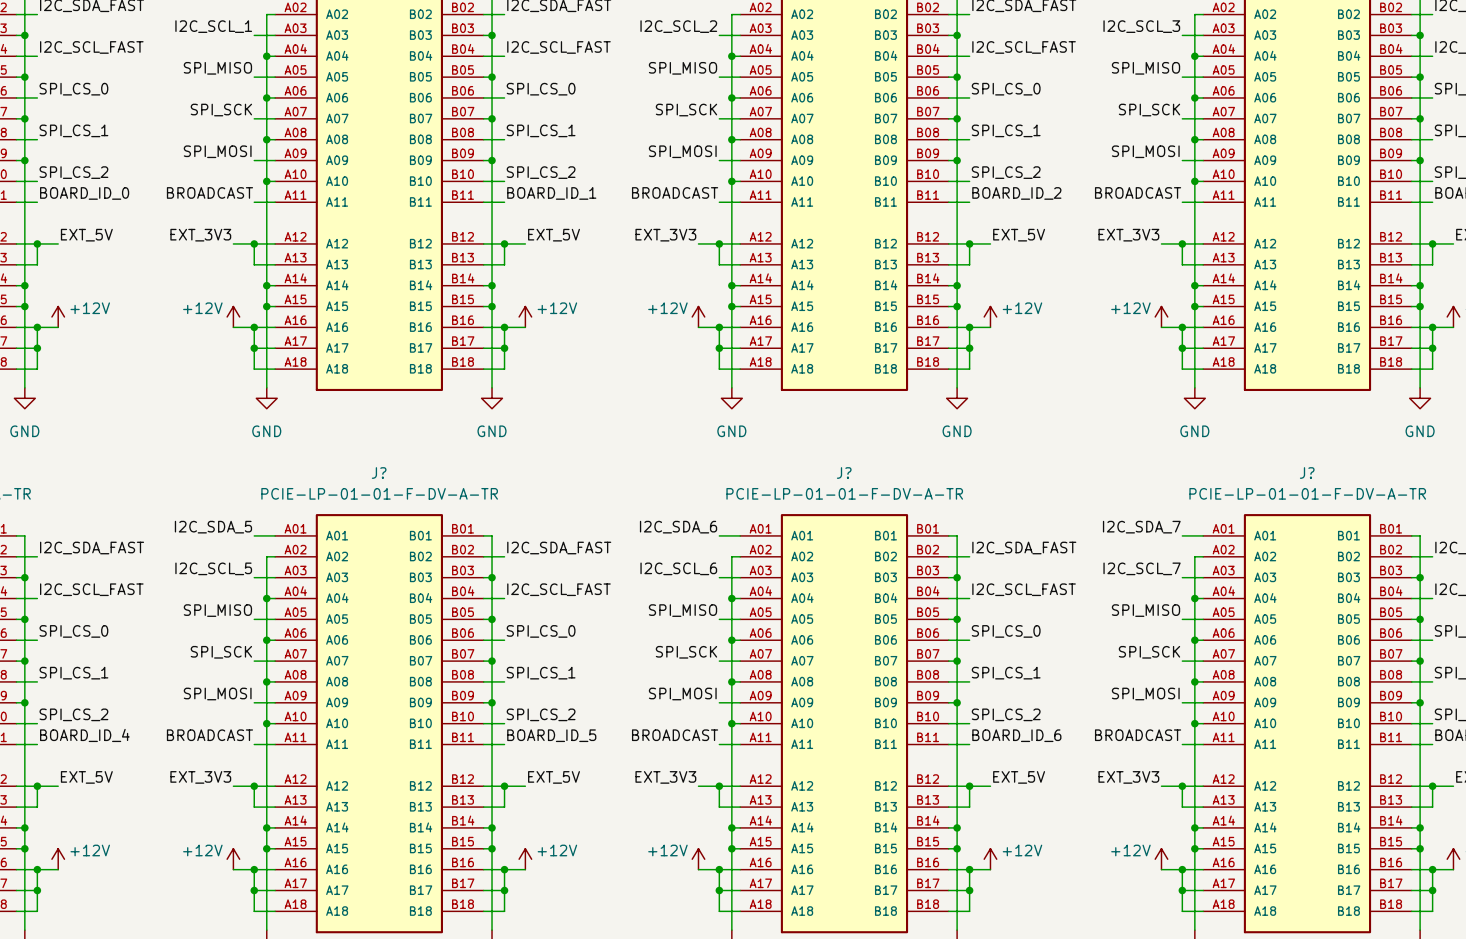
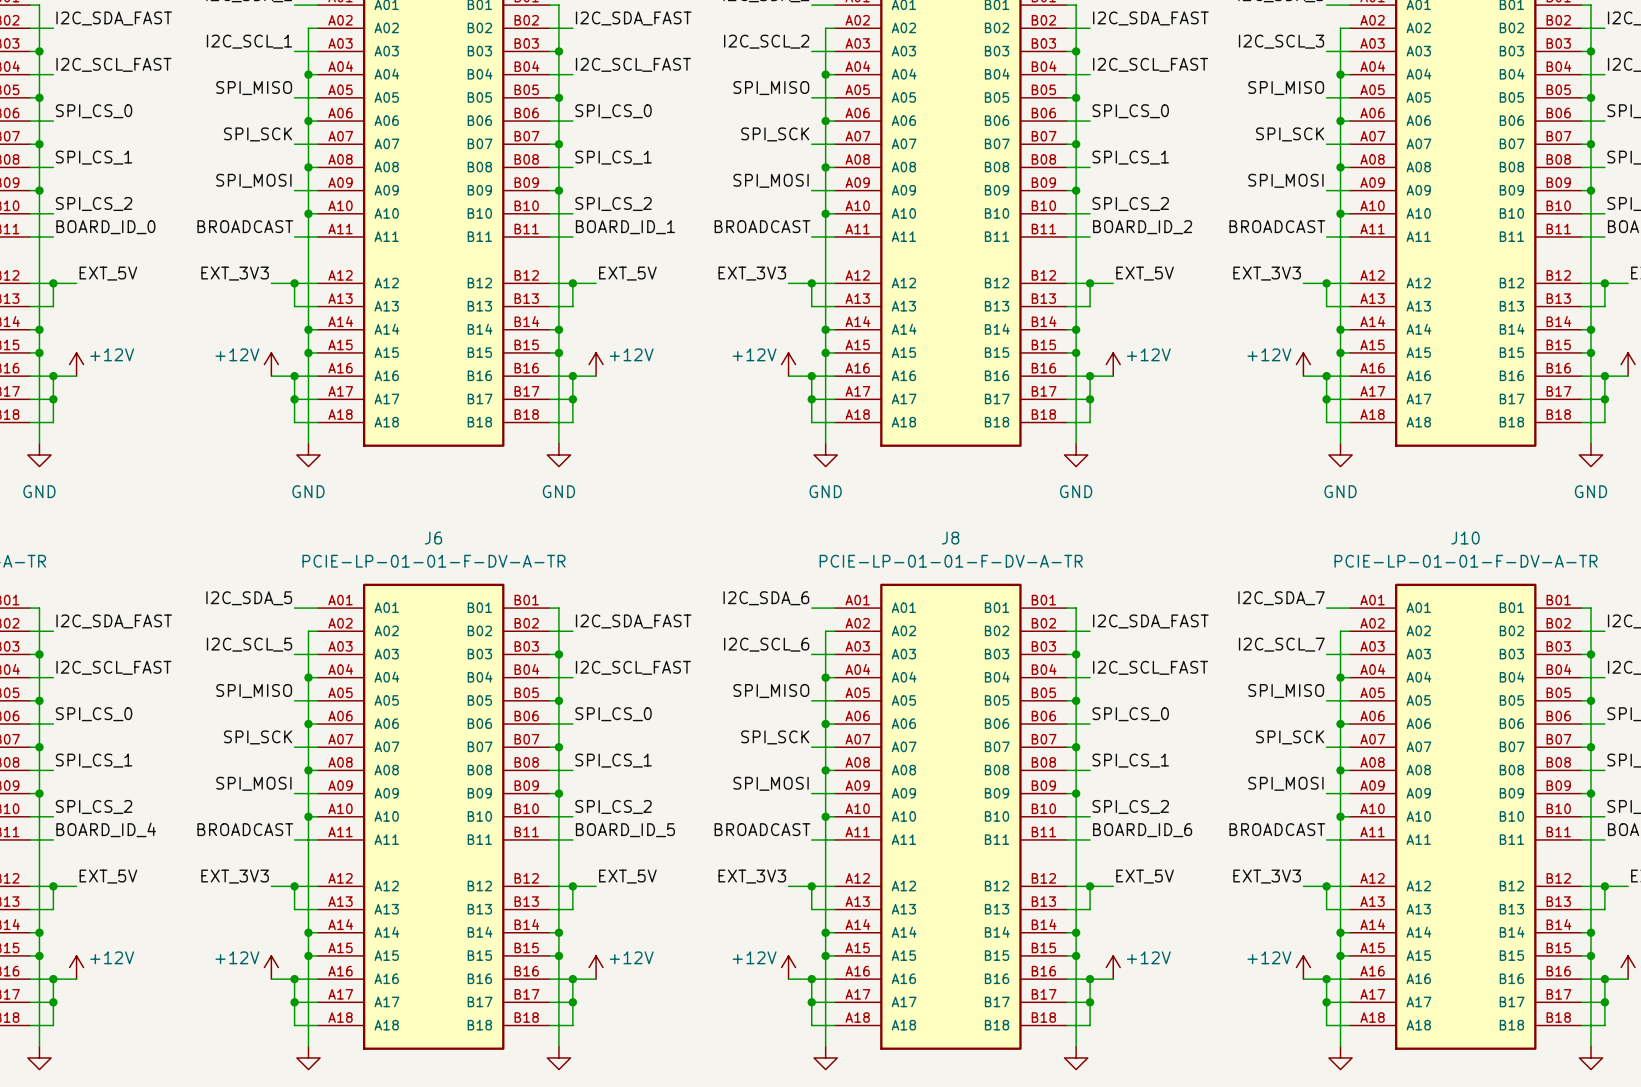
J? name: J? (379, 473) -> J6 (433, 538)
J? name: J? (844, 473) -> J8 (950, 538)
J? name: J? (1307, 473) -> J10 (1465, 538)

